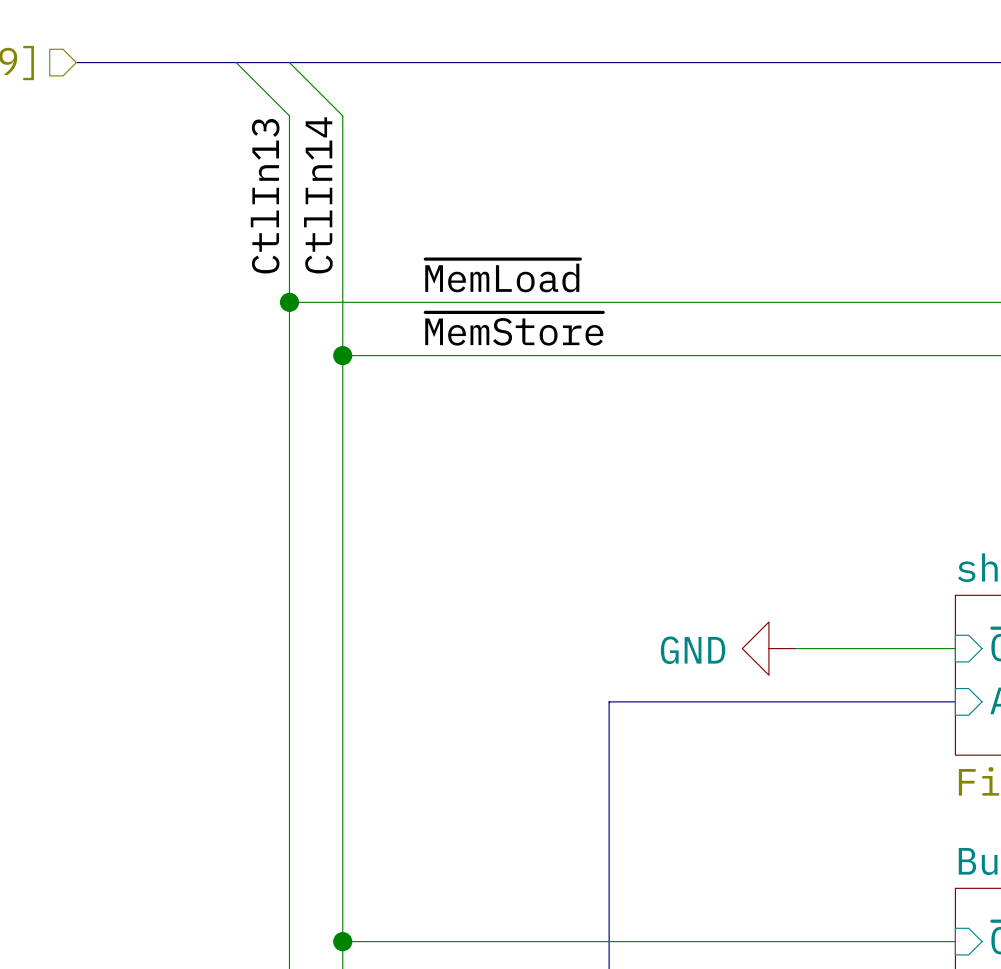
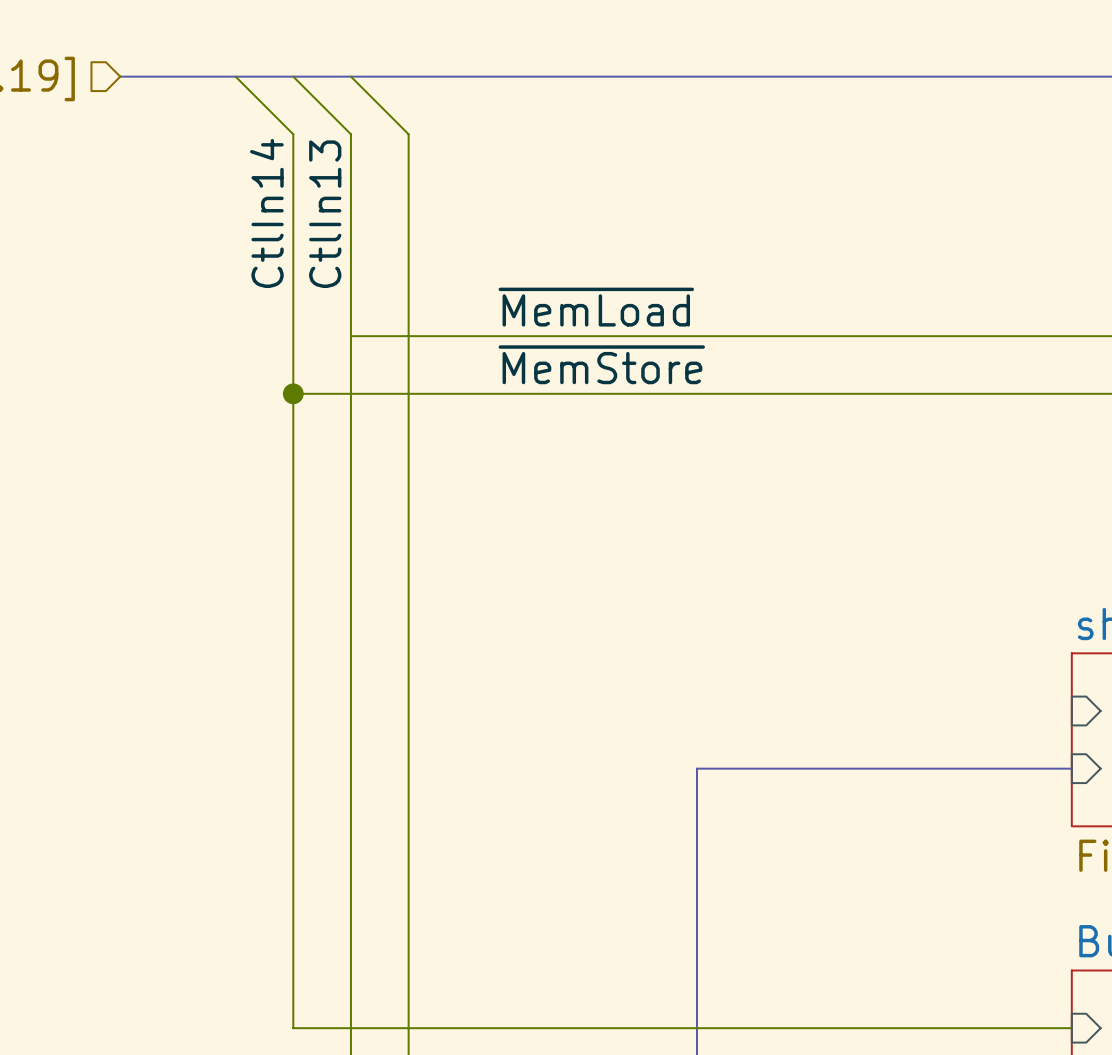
wire: none -> (235, 76) (293, 134) (293, 1028) (408, 1028)
label position: CtlIn14 (318, 195) -> CtlIn14 (266, 213)
junction: (289, 302) -> none
wire: none -> (293, 393) (408, 393)
junction: none -> (293, 393)
junction: (342, 355) -> none
power symbol: GND (768, 648) -> none
wire: (795, 648) (955, 648) -> none
junction: (342, 941) -> none

